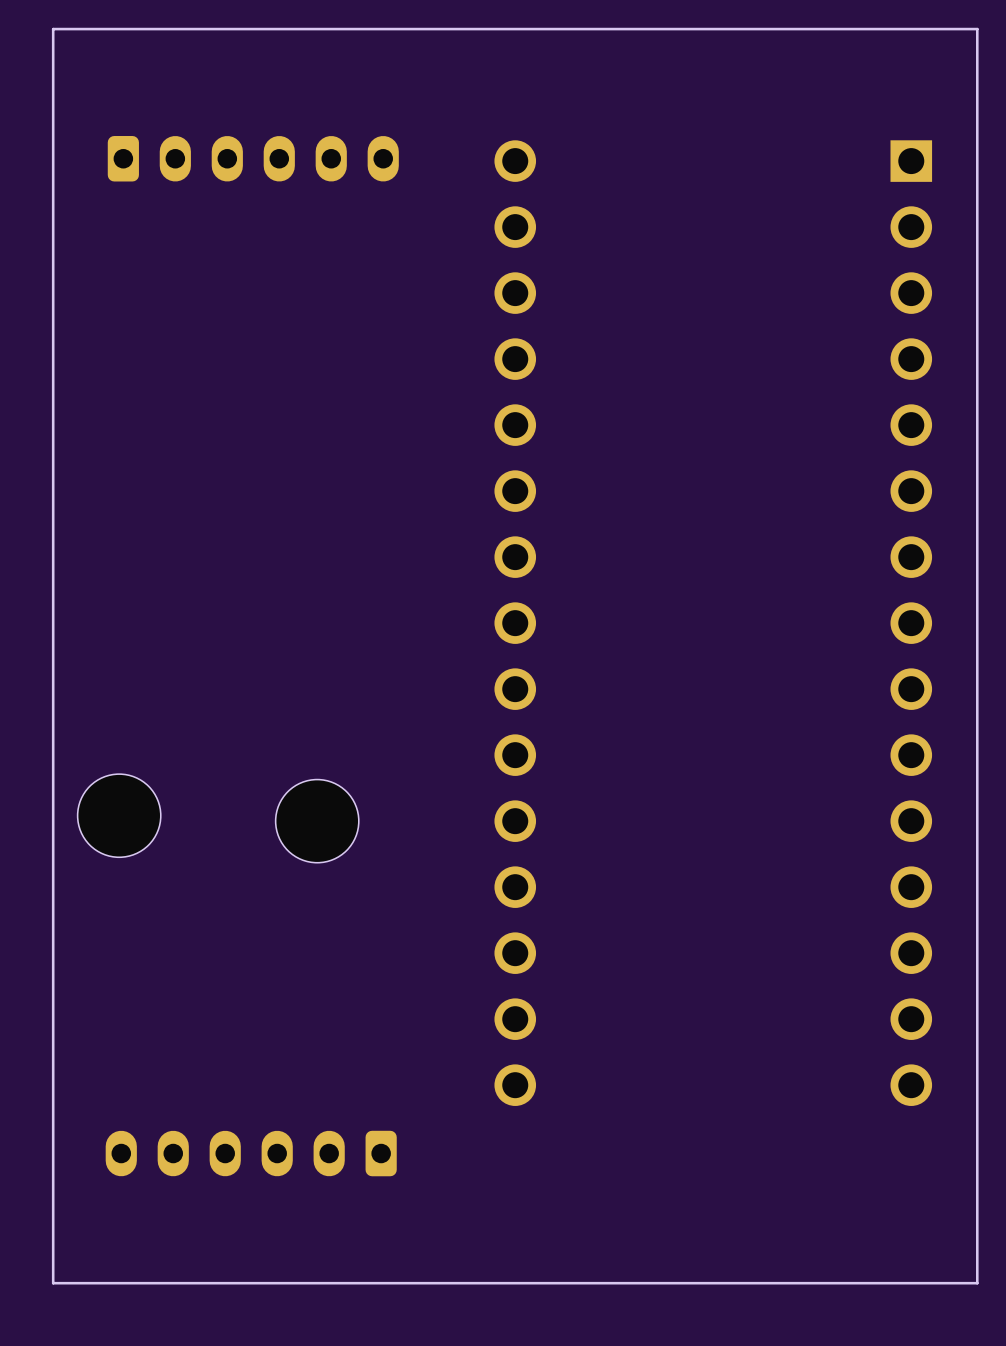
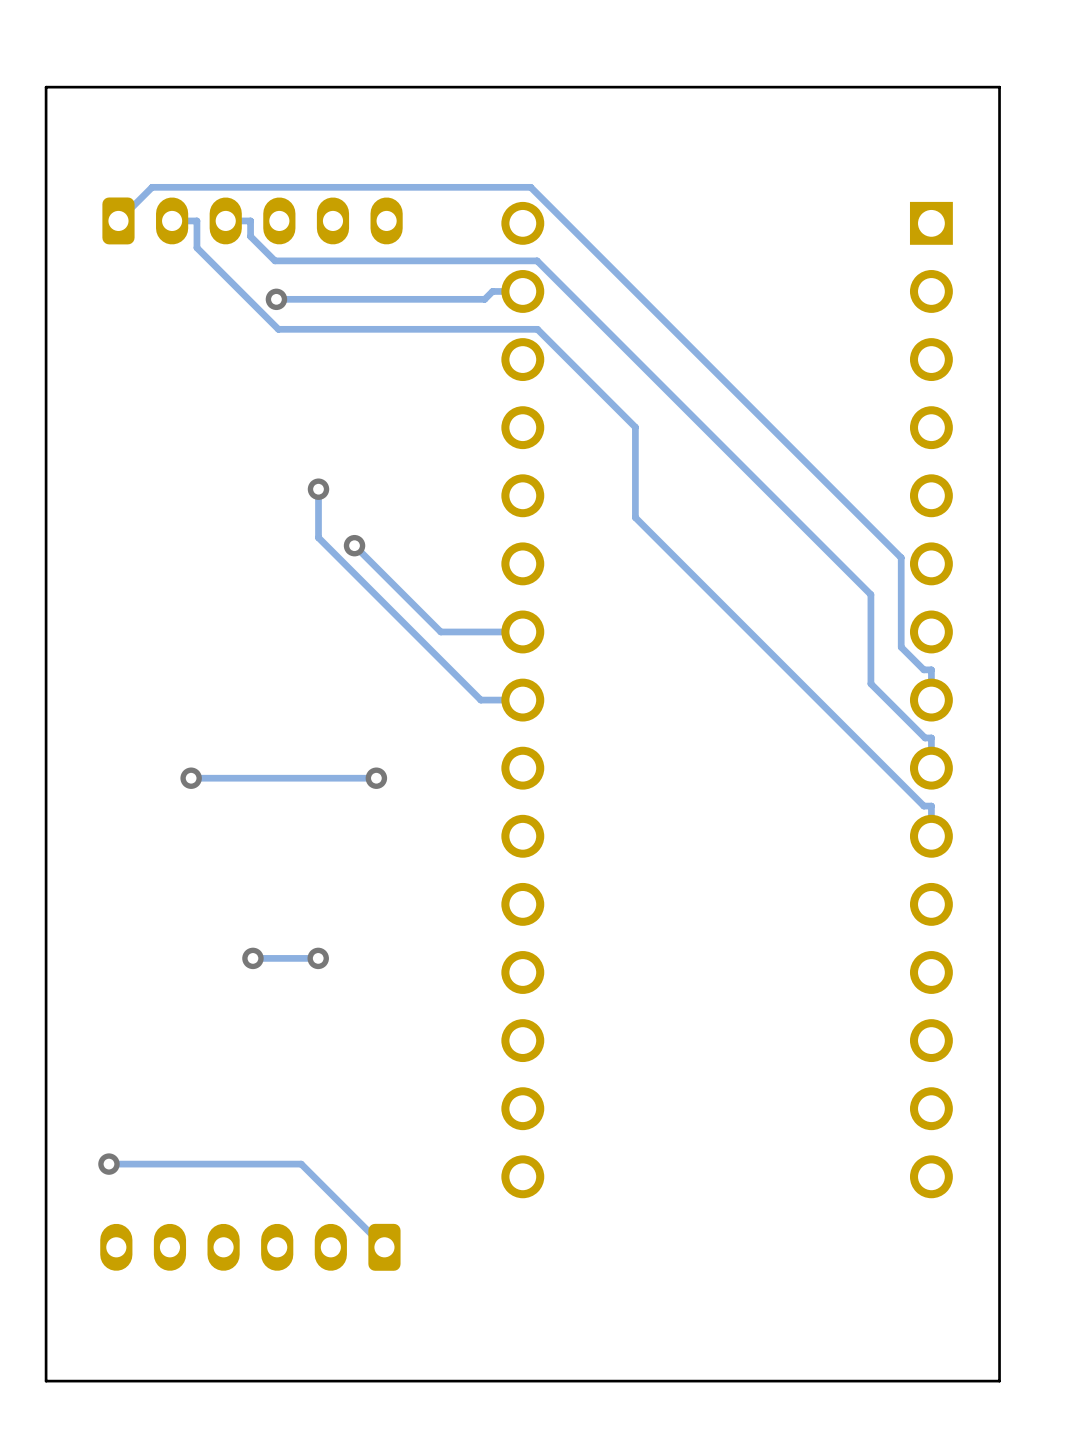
track: none -> (118, 220) (152, 187) (530, 187) (901, 557) (901, 647) (923, 669) (931, 669) (931, 700)
track: none -> (172, 220) (196, 220) (196, 247) (278, 329) (537, 329) (635, 427) (635, 517) (923, 806) (931, 806) (931, 836)
track: none -> (225, 220) (250, 220) (250, 236) (274, 260) (537, 260) (870, 594) (870, 683) (925, 737) (931, 737) (931, 768)
track: none -> (522, 291) (492, 291) (484, 299) (276, 299)
via: none -> (276, 299)
track: none -> (318, 489) (318, 537) (480, 700) (522, 700)
via: none -> (318, 489)
track: none -> (354, 545) (440, 631) (522, 631)
via: none -> (354, 545)
via: none -> (191, 778)
track: none -> (376, 778) (191, 778)
via: none -> (376, 778)
part: (119, 815) -> none
part: (317, 821) -> none
via: none -> (252, 958)
track: none -> (318, 958) (252, 958)
via: none -> (318, 958)
track: none -> (108, 1164) (301, 1164) (384, 1247)
via: none -> (108, 1164)

